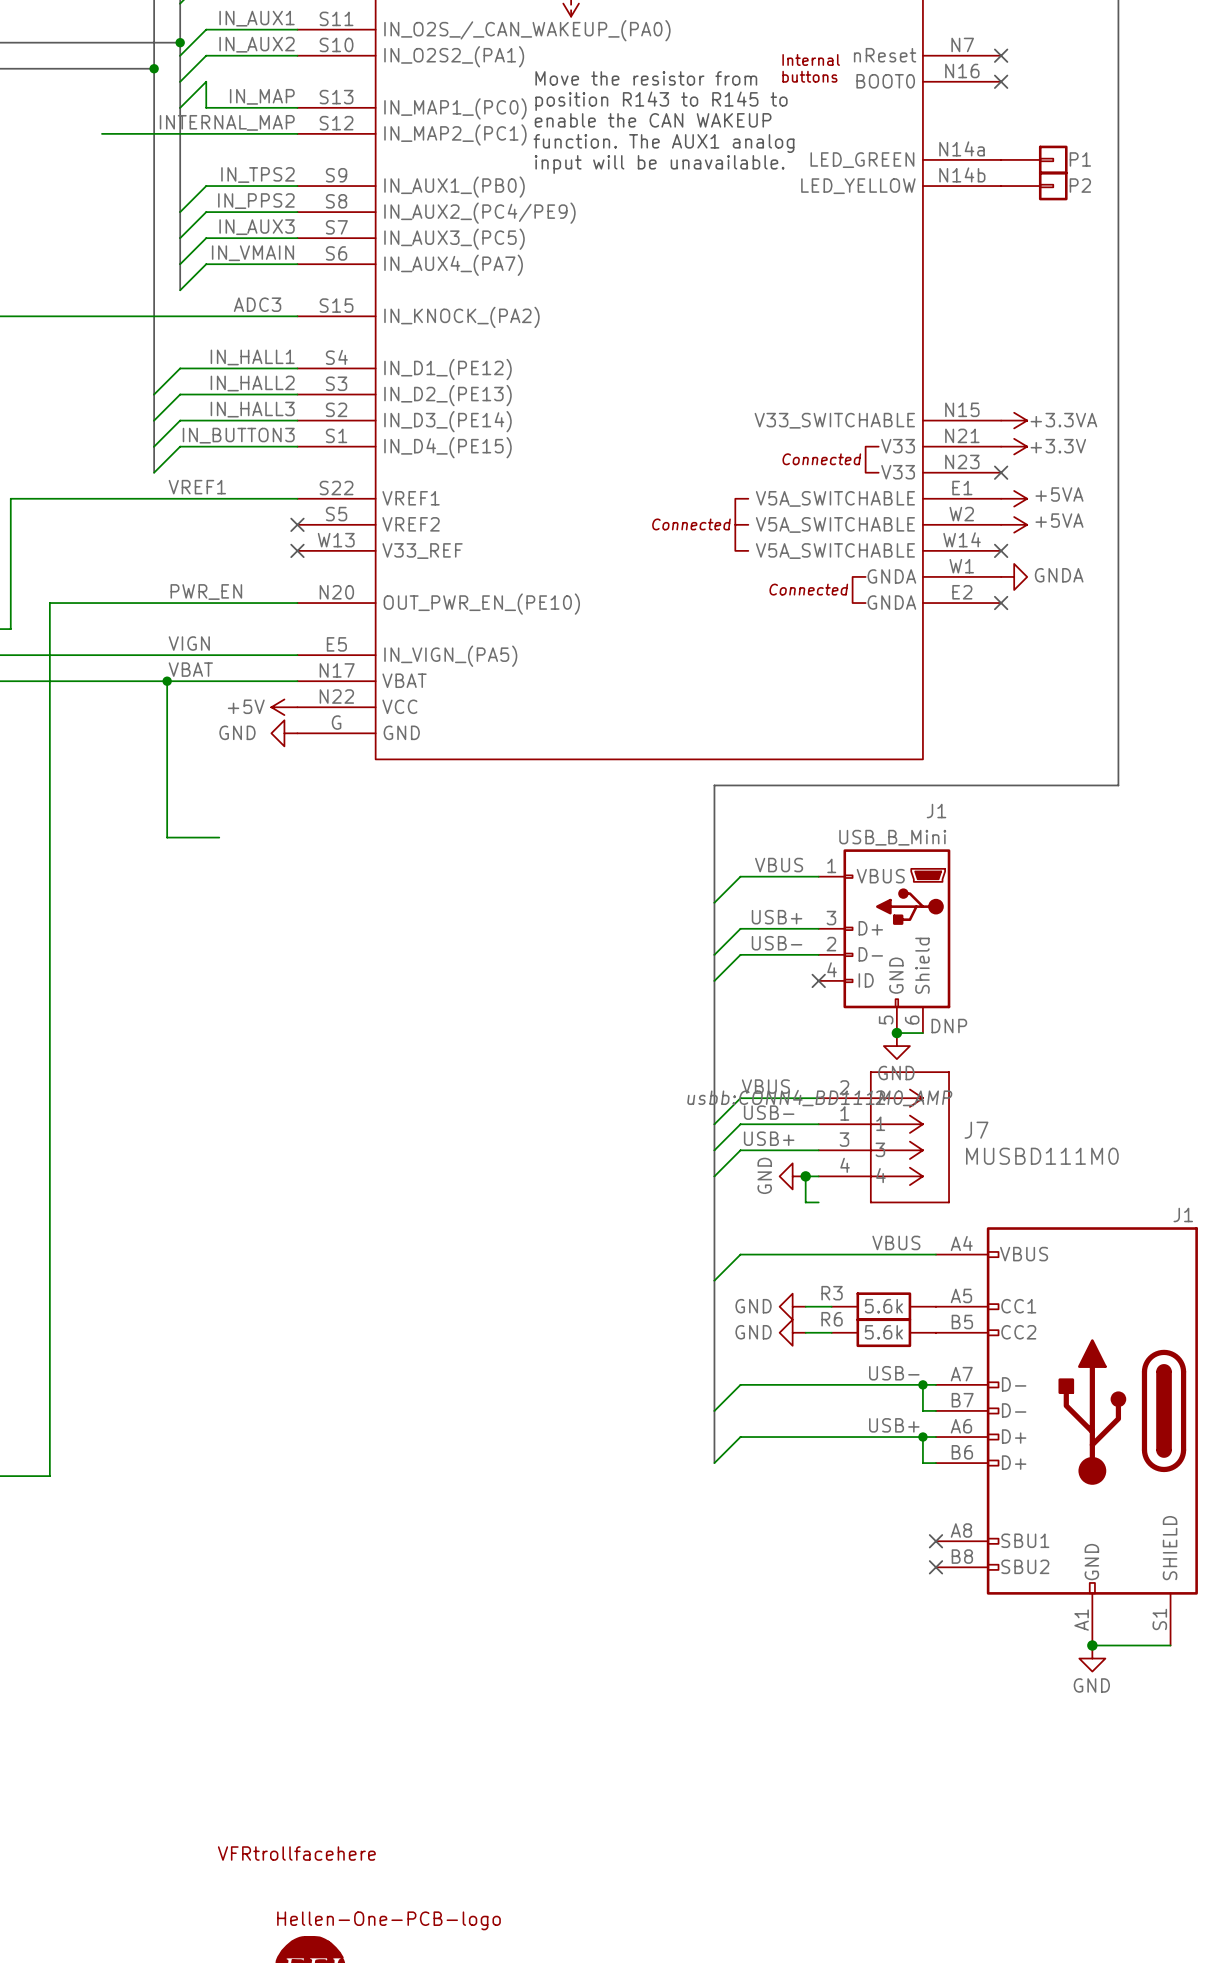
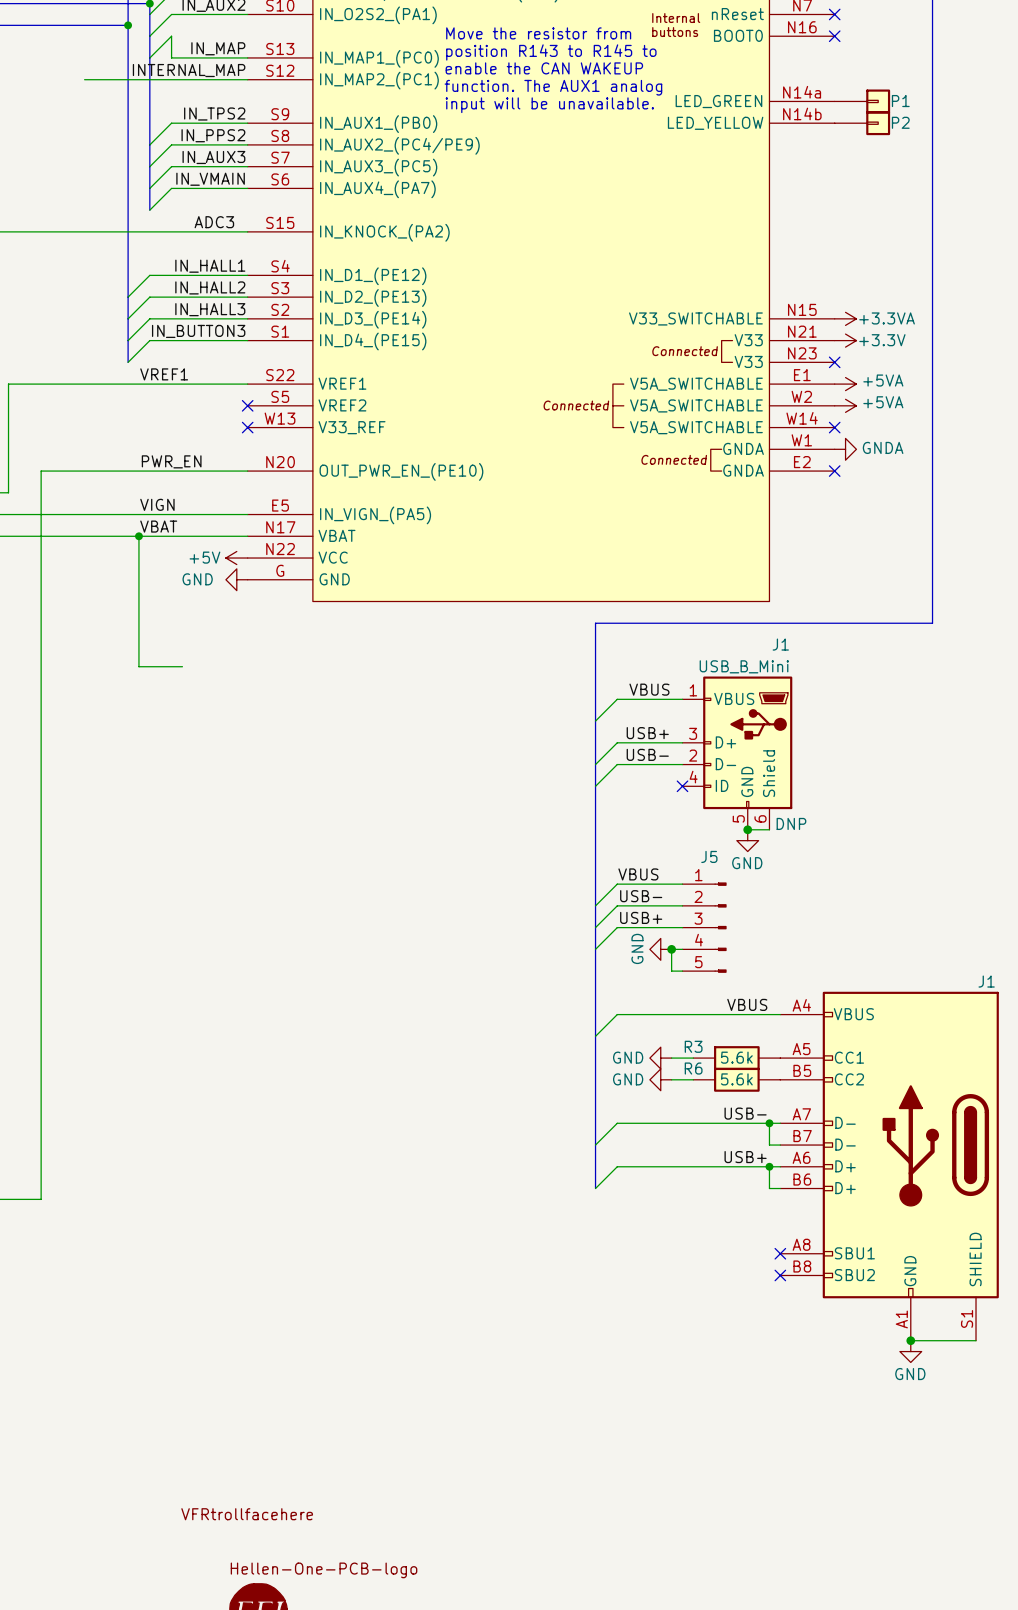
J7: MUSBD111M0 (884, 1137) -> none
J5: none -> (704, 927)

